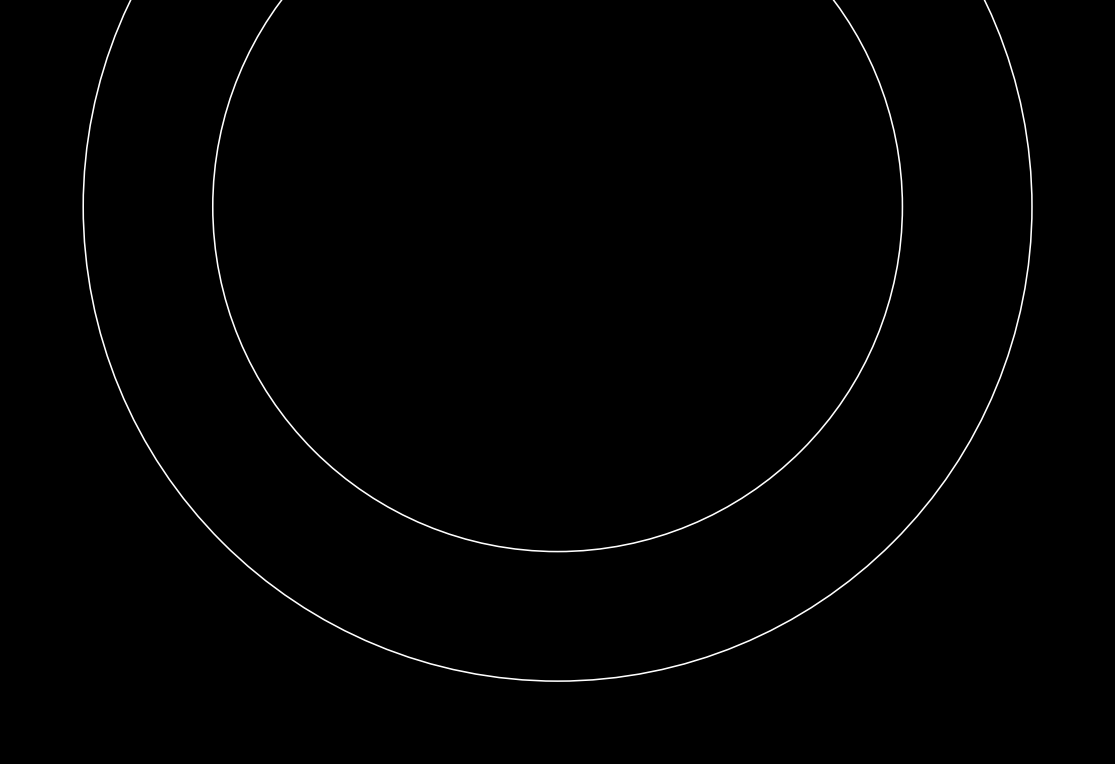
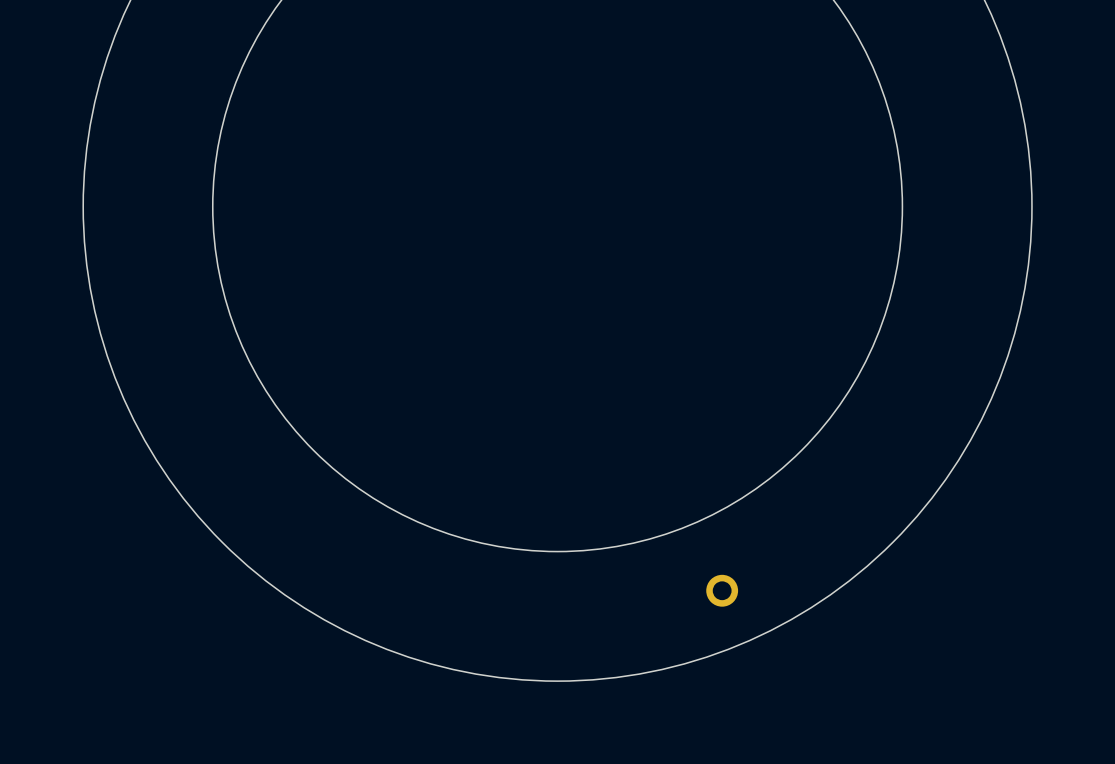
part: none -> (722, 590)

